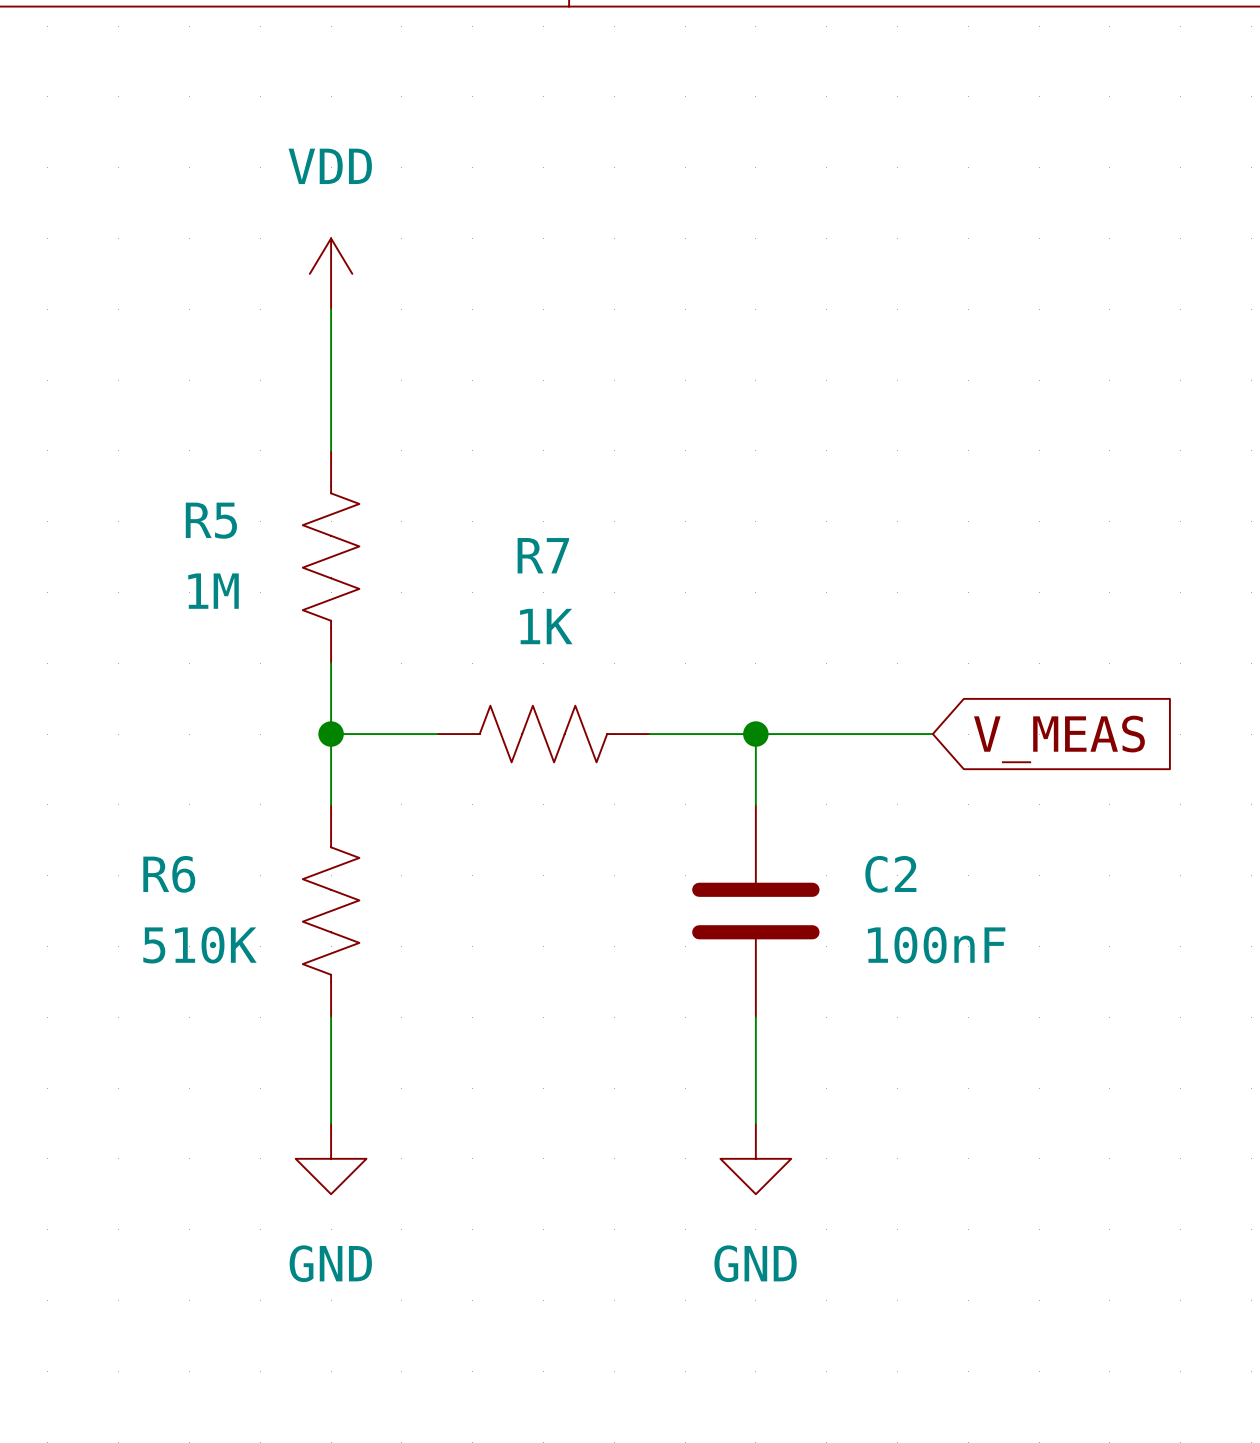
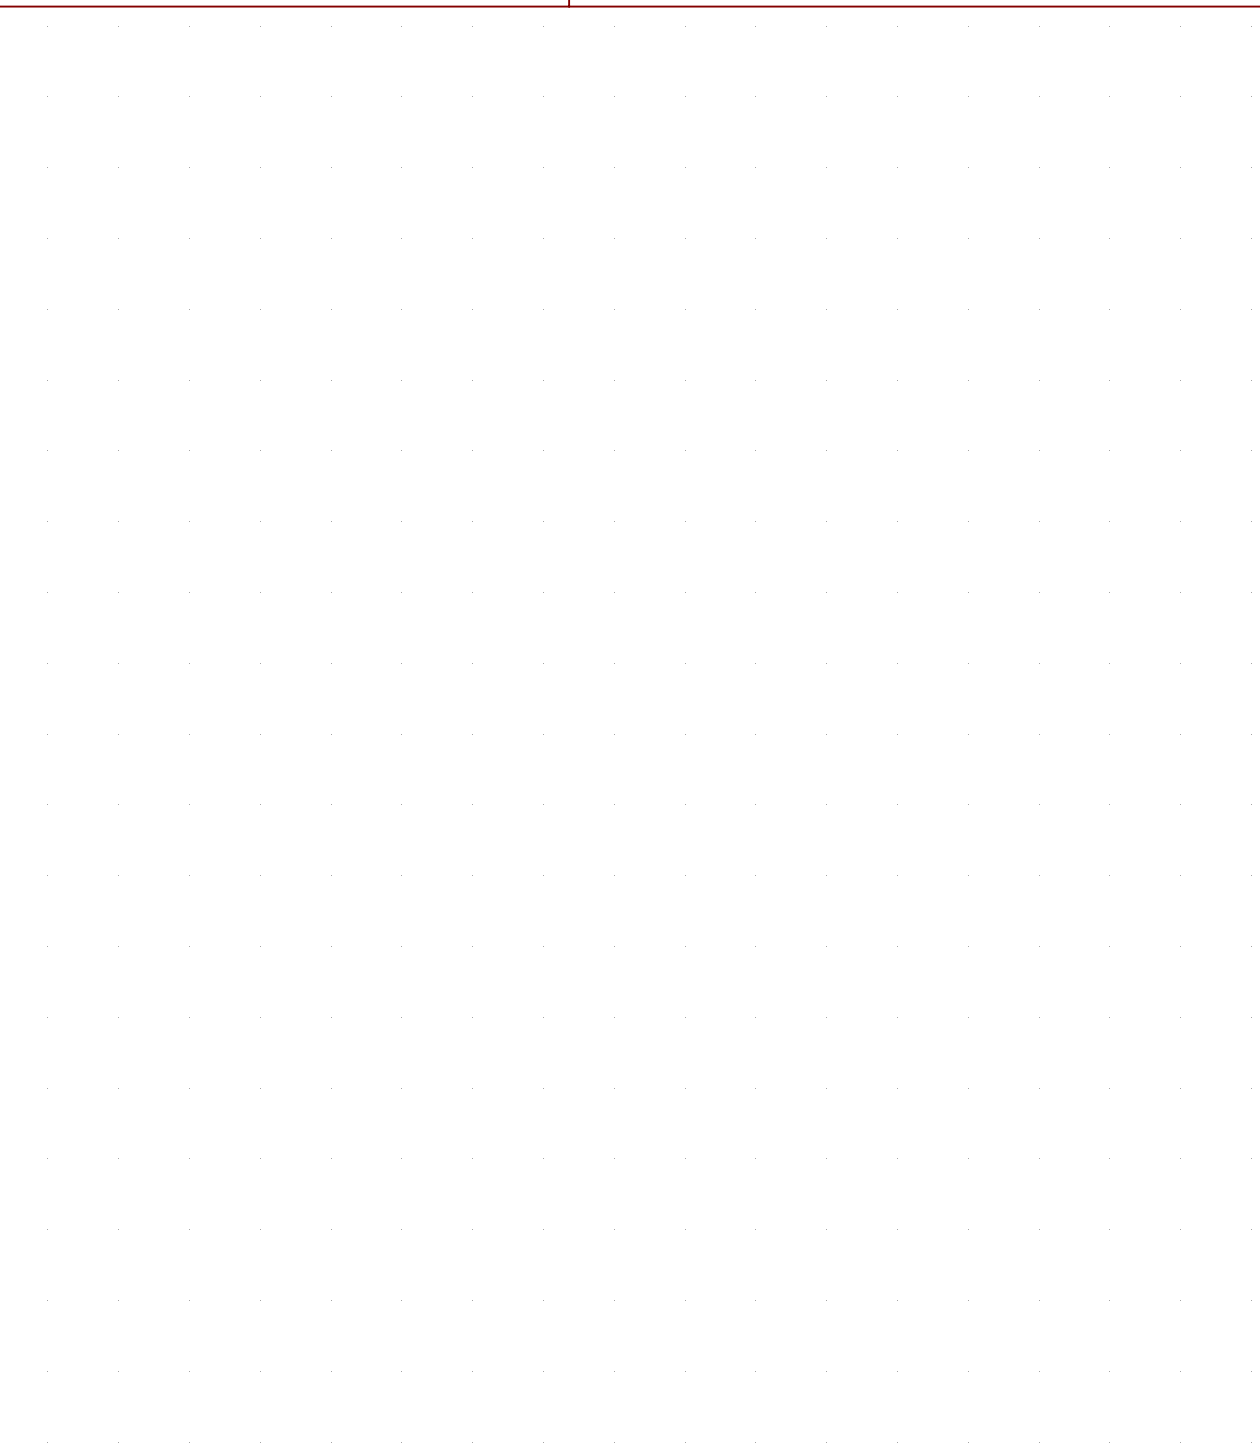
power symbol: VDD (331, 273) -> none
wire: (331, 309) (331, 450) -> none
R5: 1M (331, 557) -> none
wire: (331, 663) (331, 804) -> none
wire: (331, 734) (437, 734) -> none
junction: (331, 734) -> none
R7: 1K (543, 734) -> none
wire: (649, 734) (932, 734) -> none
wire: (755, 734) (755, 804) -> none
junction: (755, 734) -> none
global label: V_MEAS (1059, 739) -> none
R6: 510K (331, 911) -> none
C2: 100nF (755, 911) -> none
wire: (331, 1017) (331, 1123) -> none
wire: (755, 1017) (755, 1123) -> none
power symbol: GND (331, 1158) -> none
power symbol: GND (755, 1158) -> none

